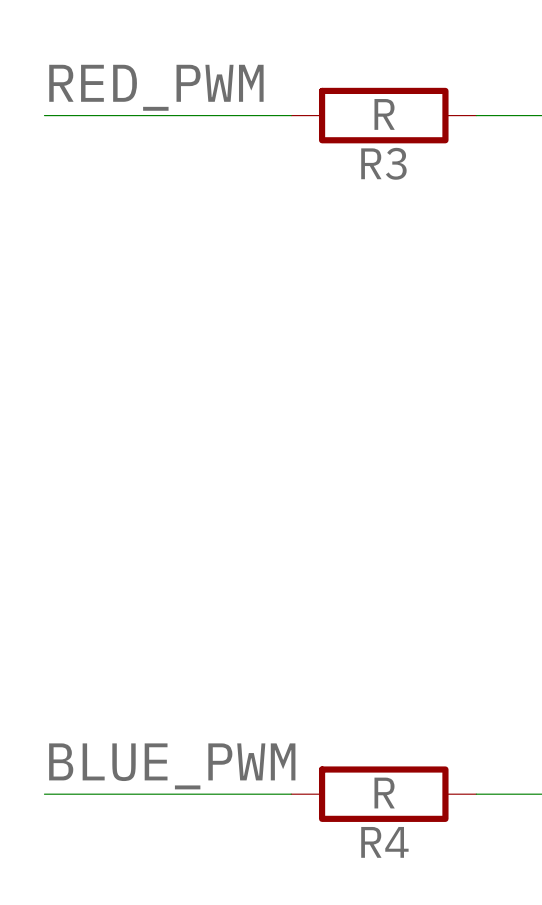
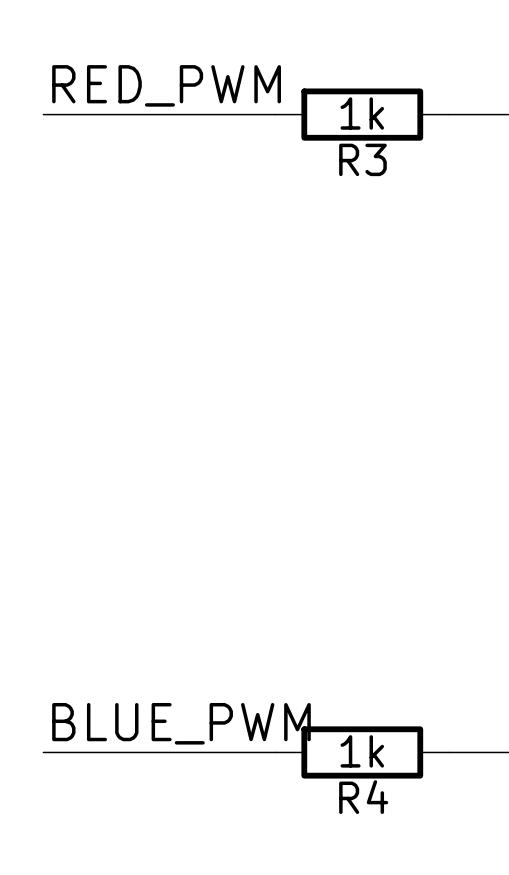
R3 value: R (384, 114) -> 1k (362, 113)
R4 value: R (384, 793) -> 1k (362, 751)

